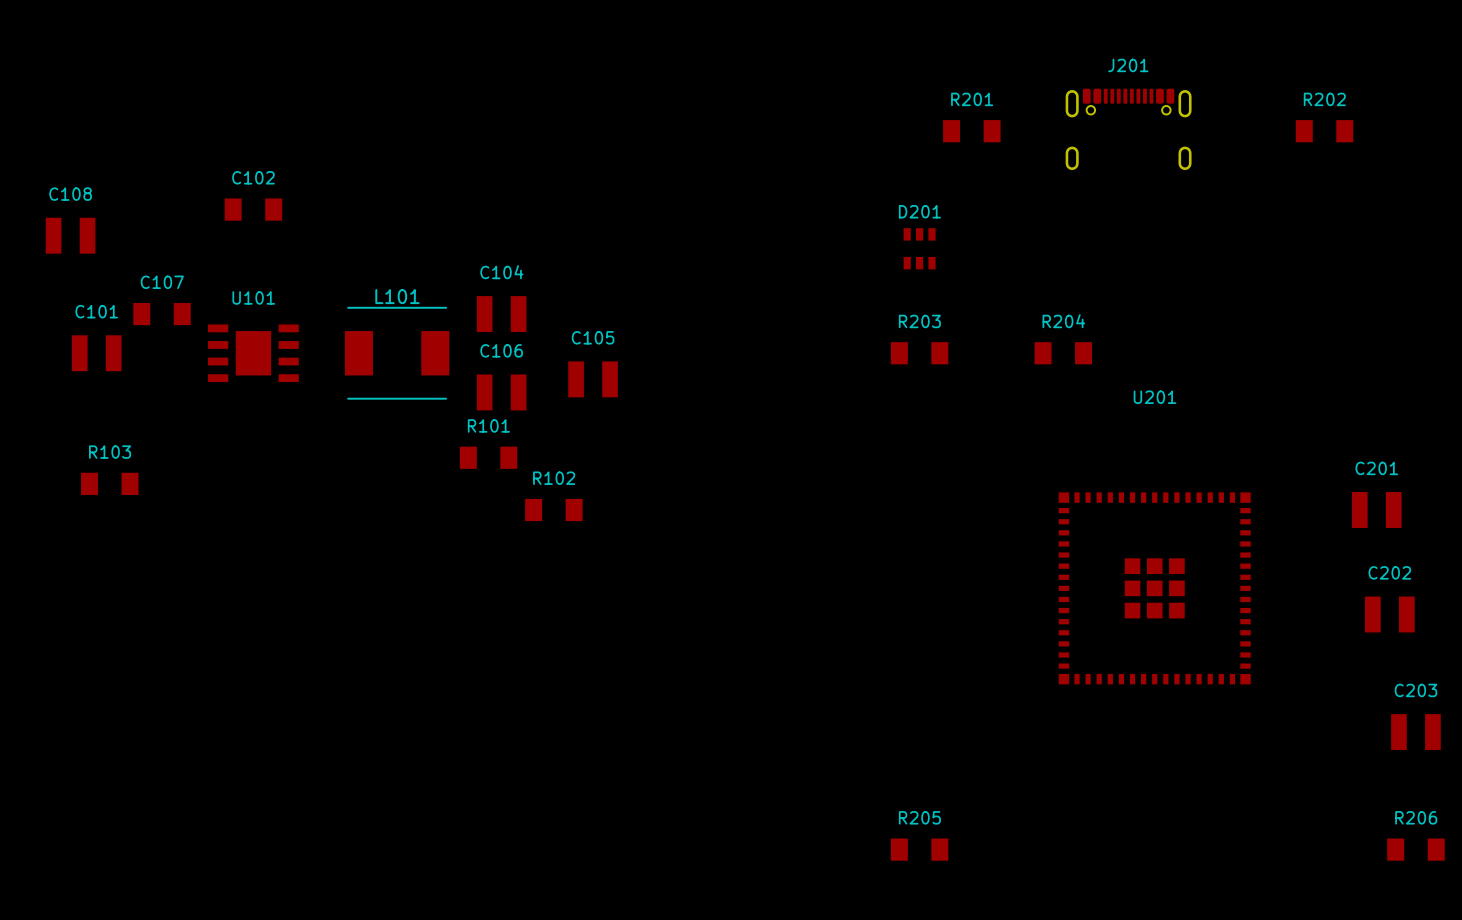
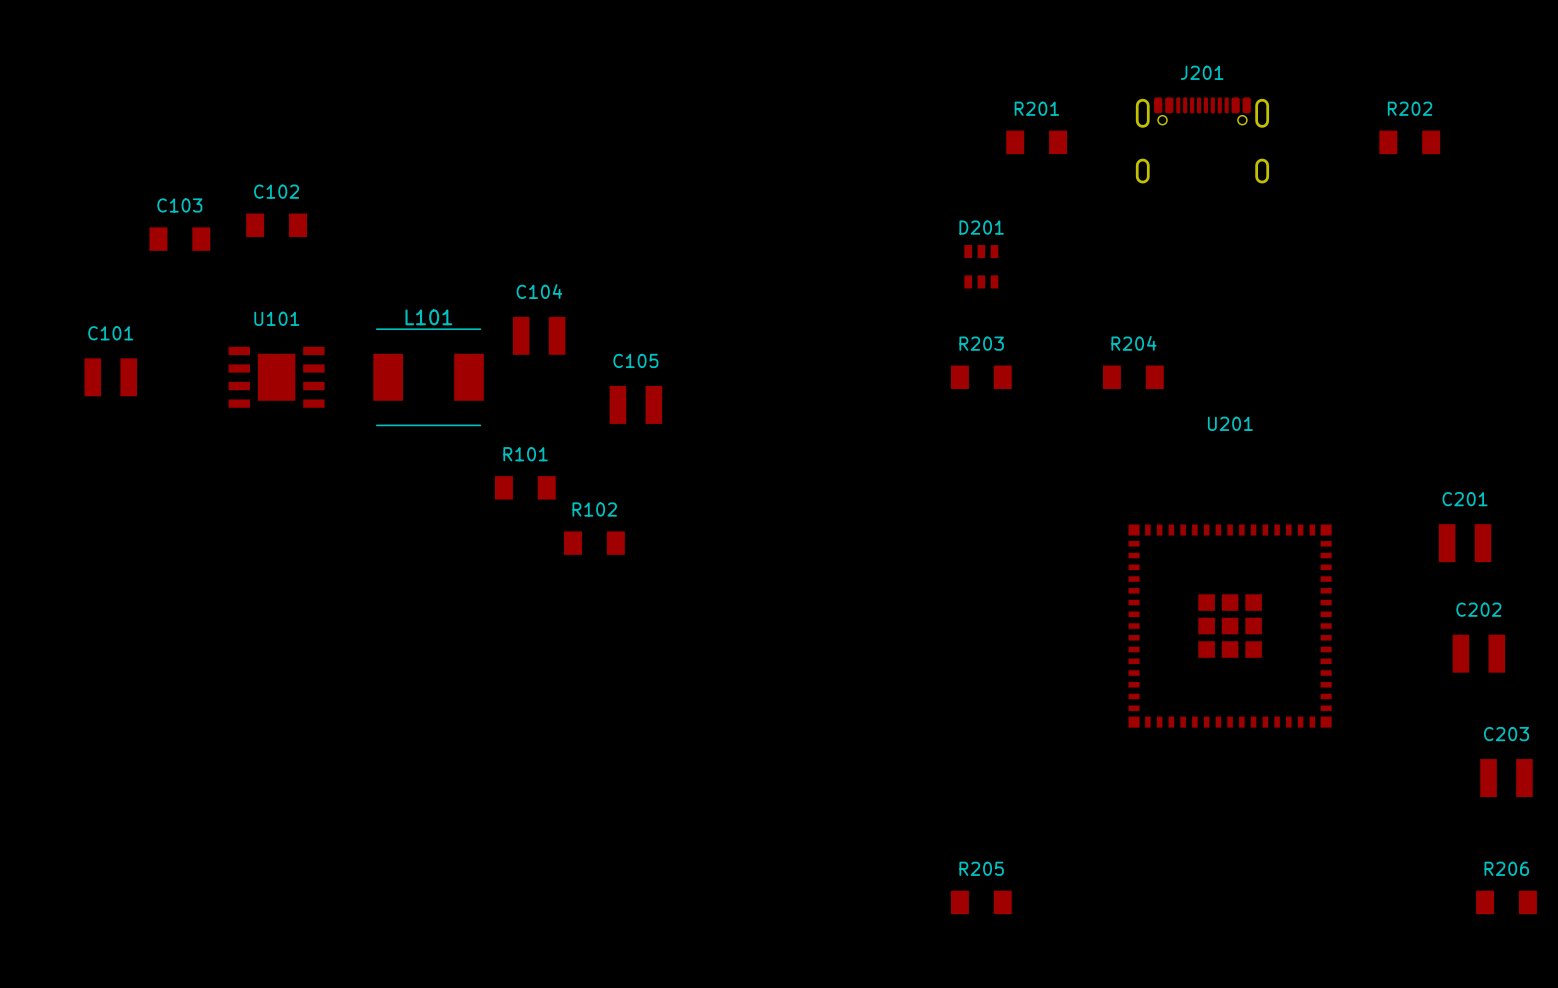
C103: none -> (179, 239)
C108: (70, 235) -> none
C107: (162, 314) -> none
C106: (501, 392) -> none
R103: (109, 483) -> none

